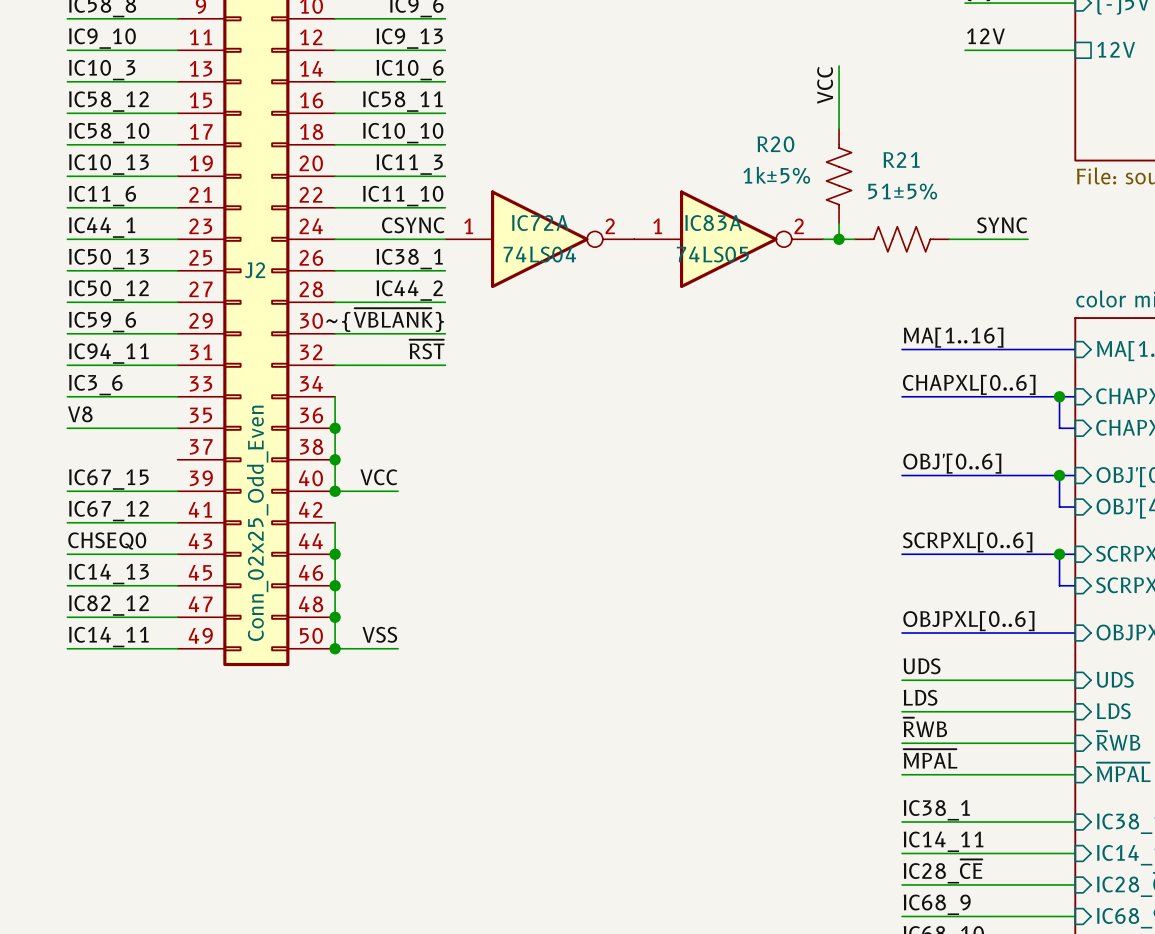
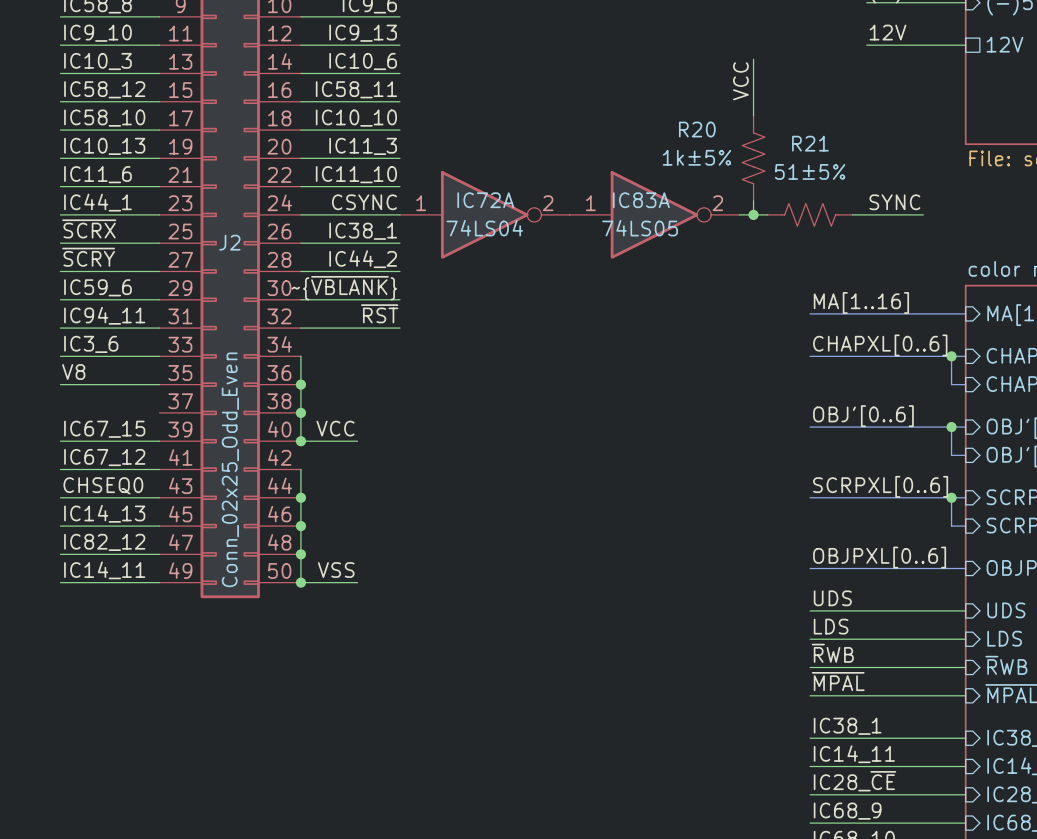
label: IC50_13 (108, 259) -> ~{SCRX} (89, 228)
label: IC50_12 (108, 290) -> ~{SCRY} (88, 257)

